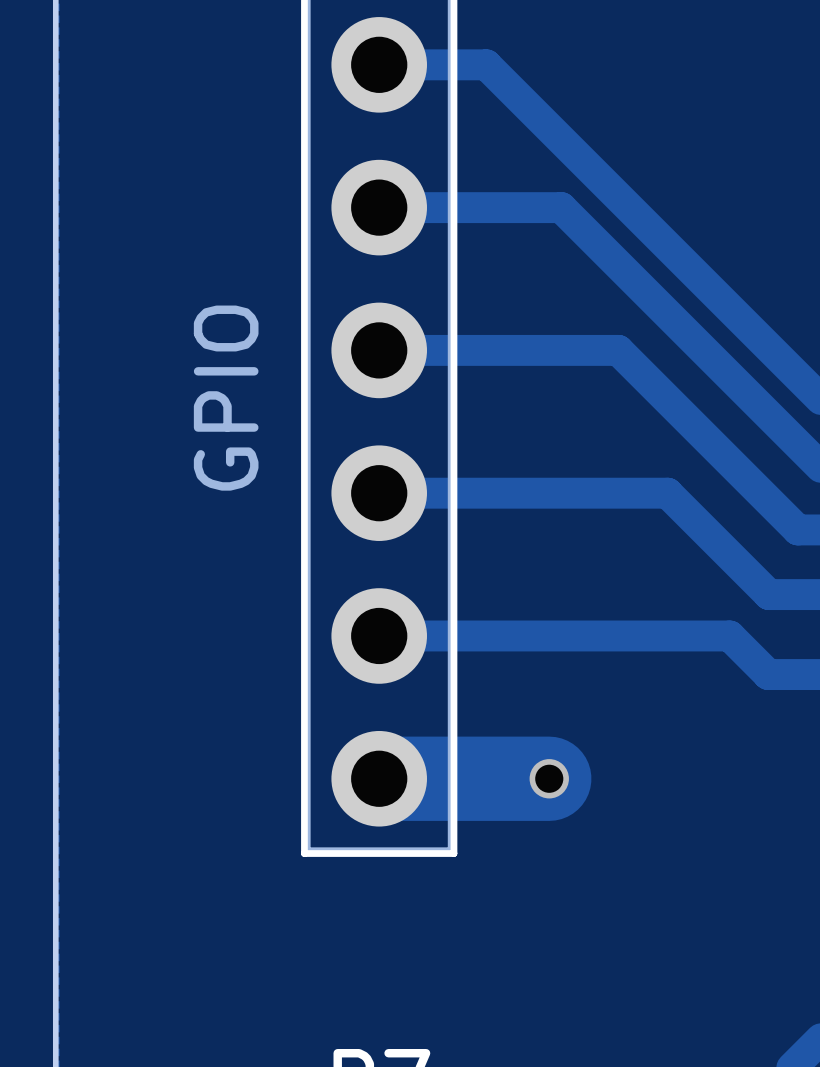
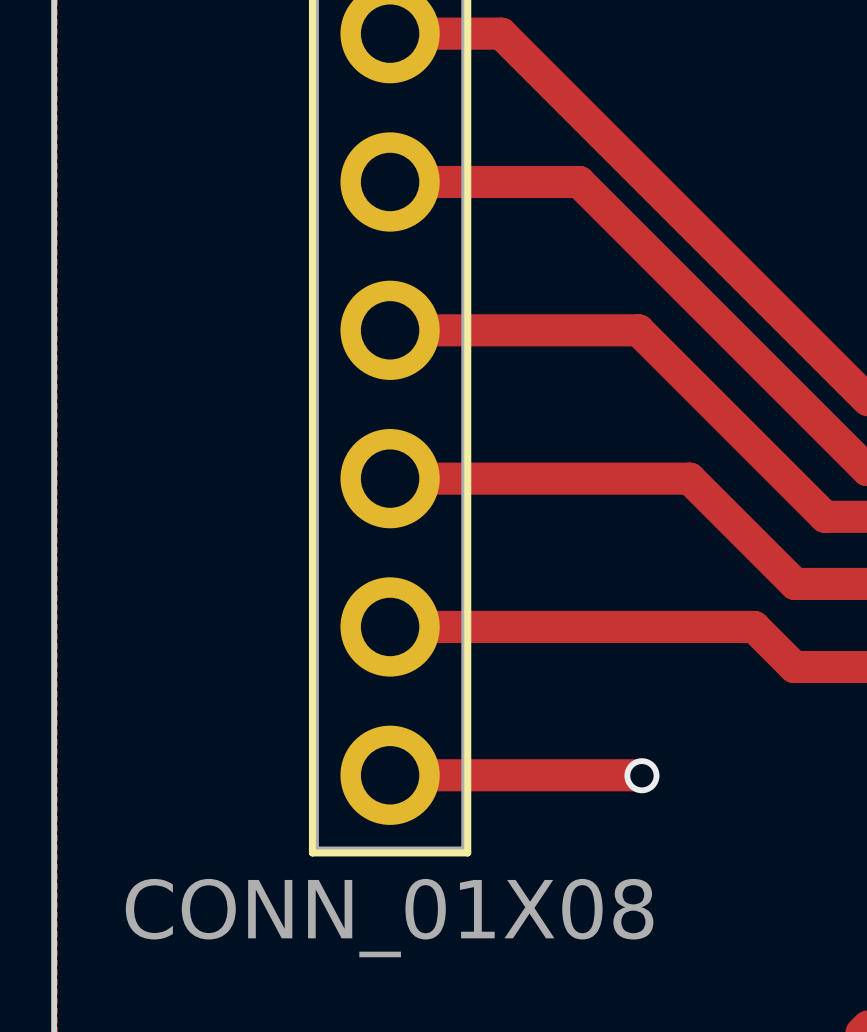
part value: GPIO (226, 398) -> CONN_01X08 (389, 918)
track width: thick (379, 778) (549, 778) -> thin (390, 775) (566, 775)
track: none -> (566, 775) (641, 775)
via: (549, 778) -> none
via: none -> (641, 775)

